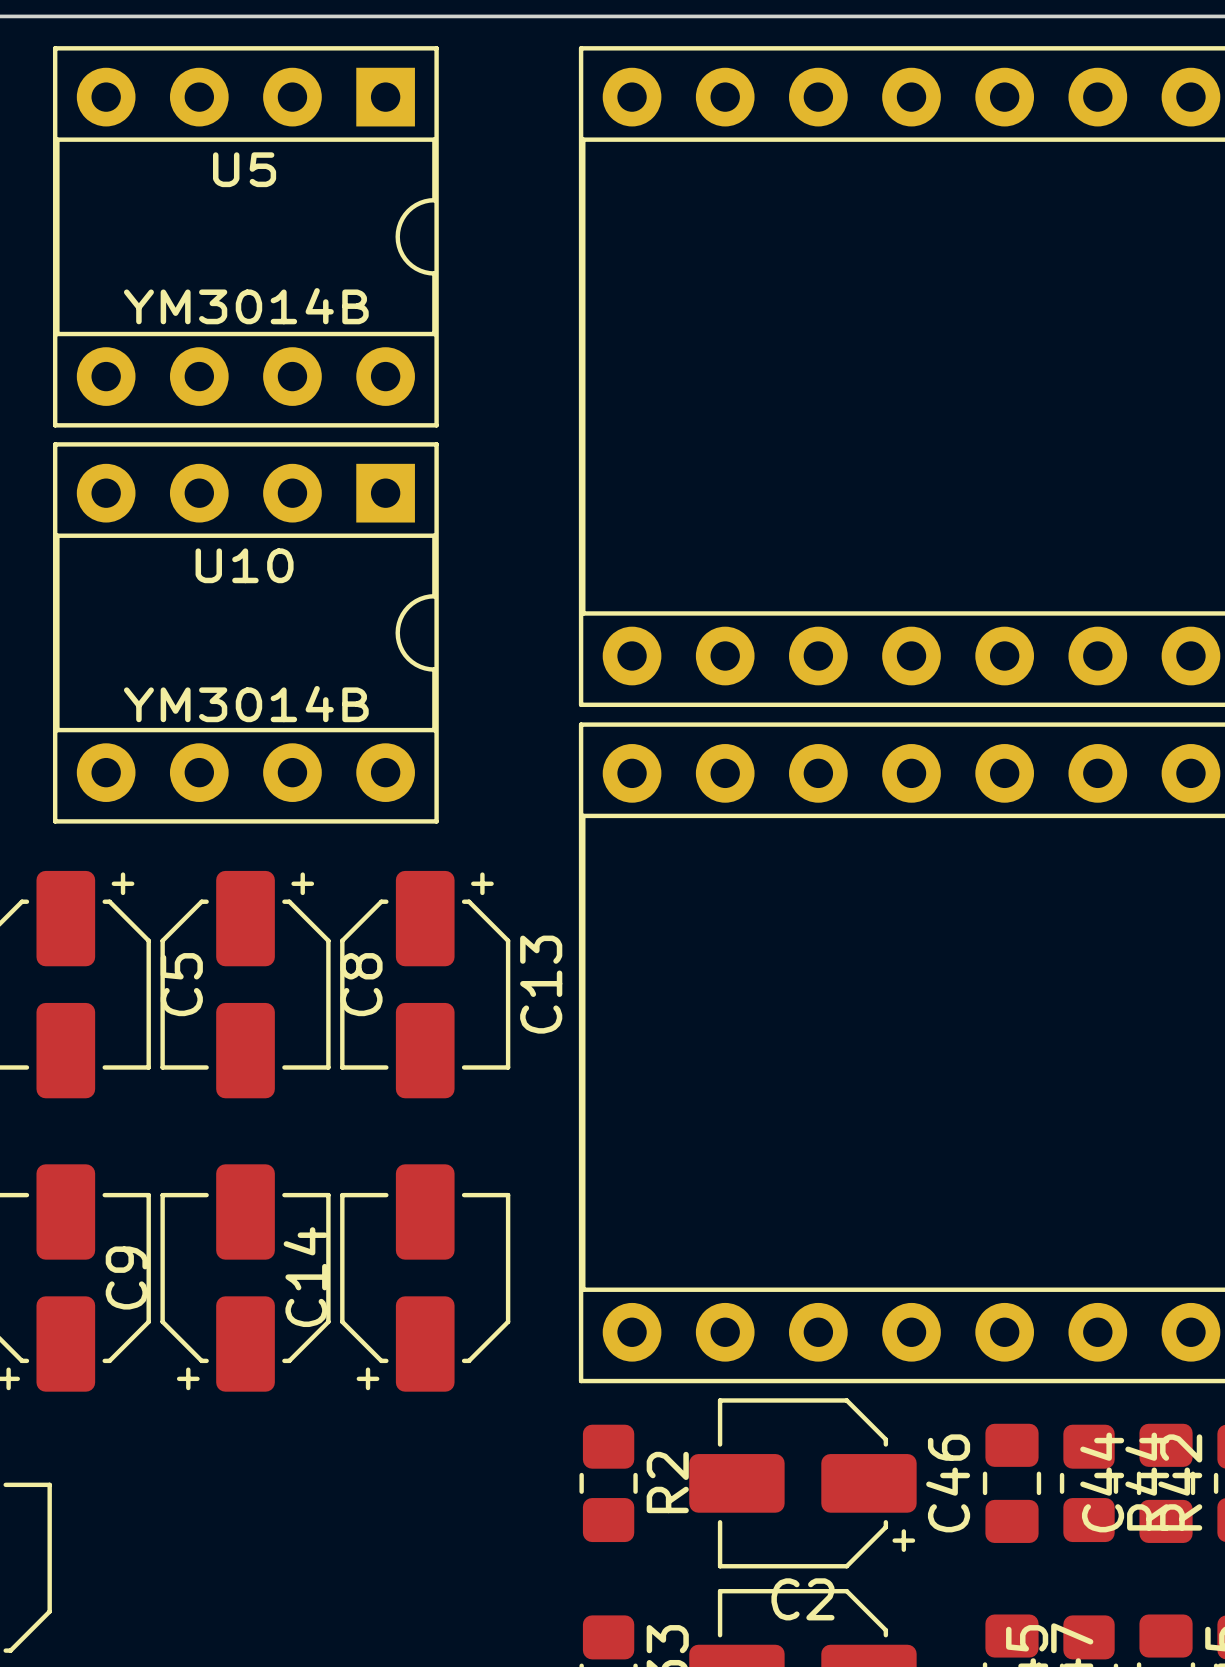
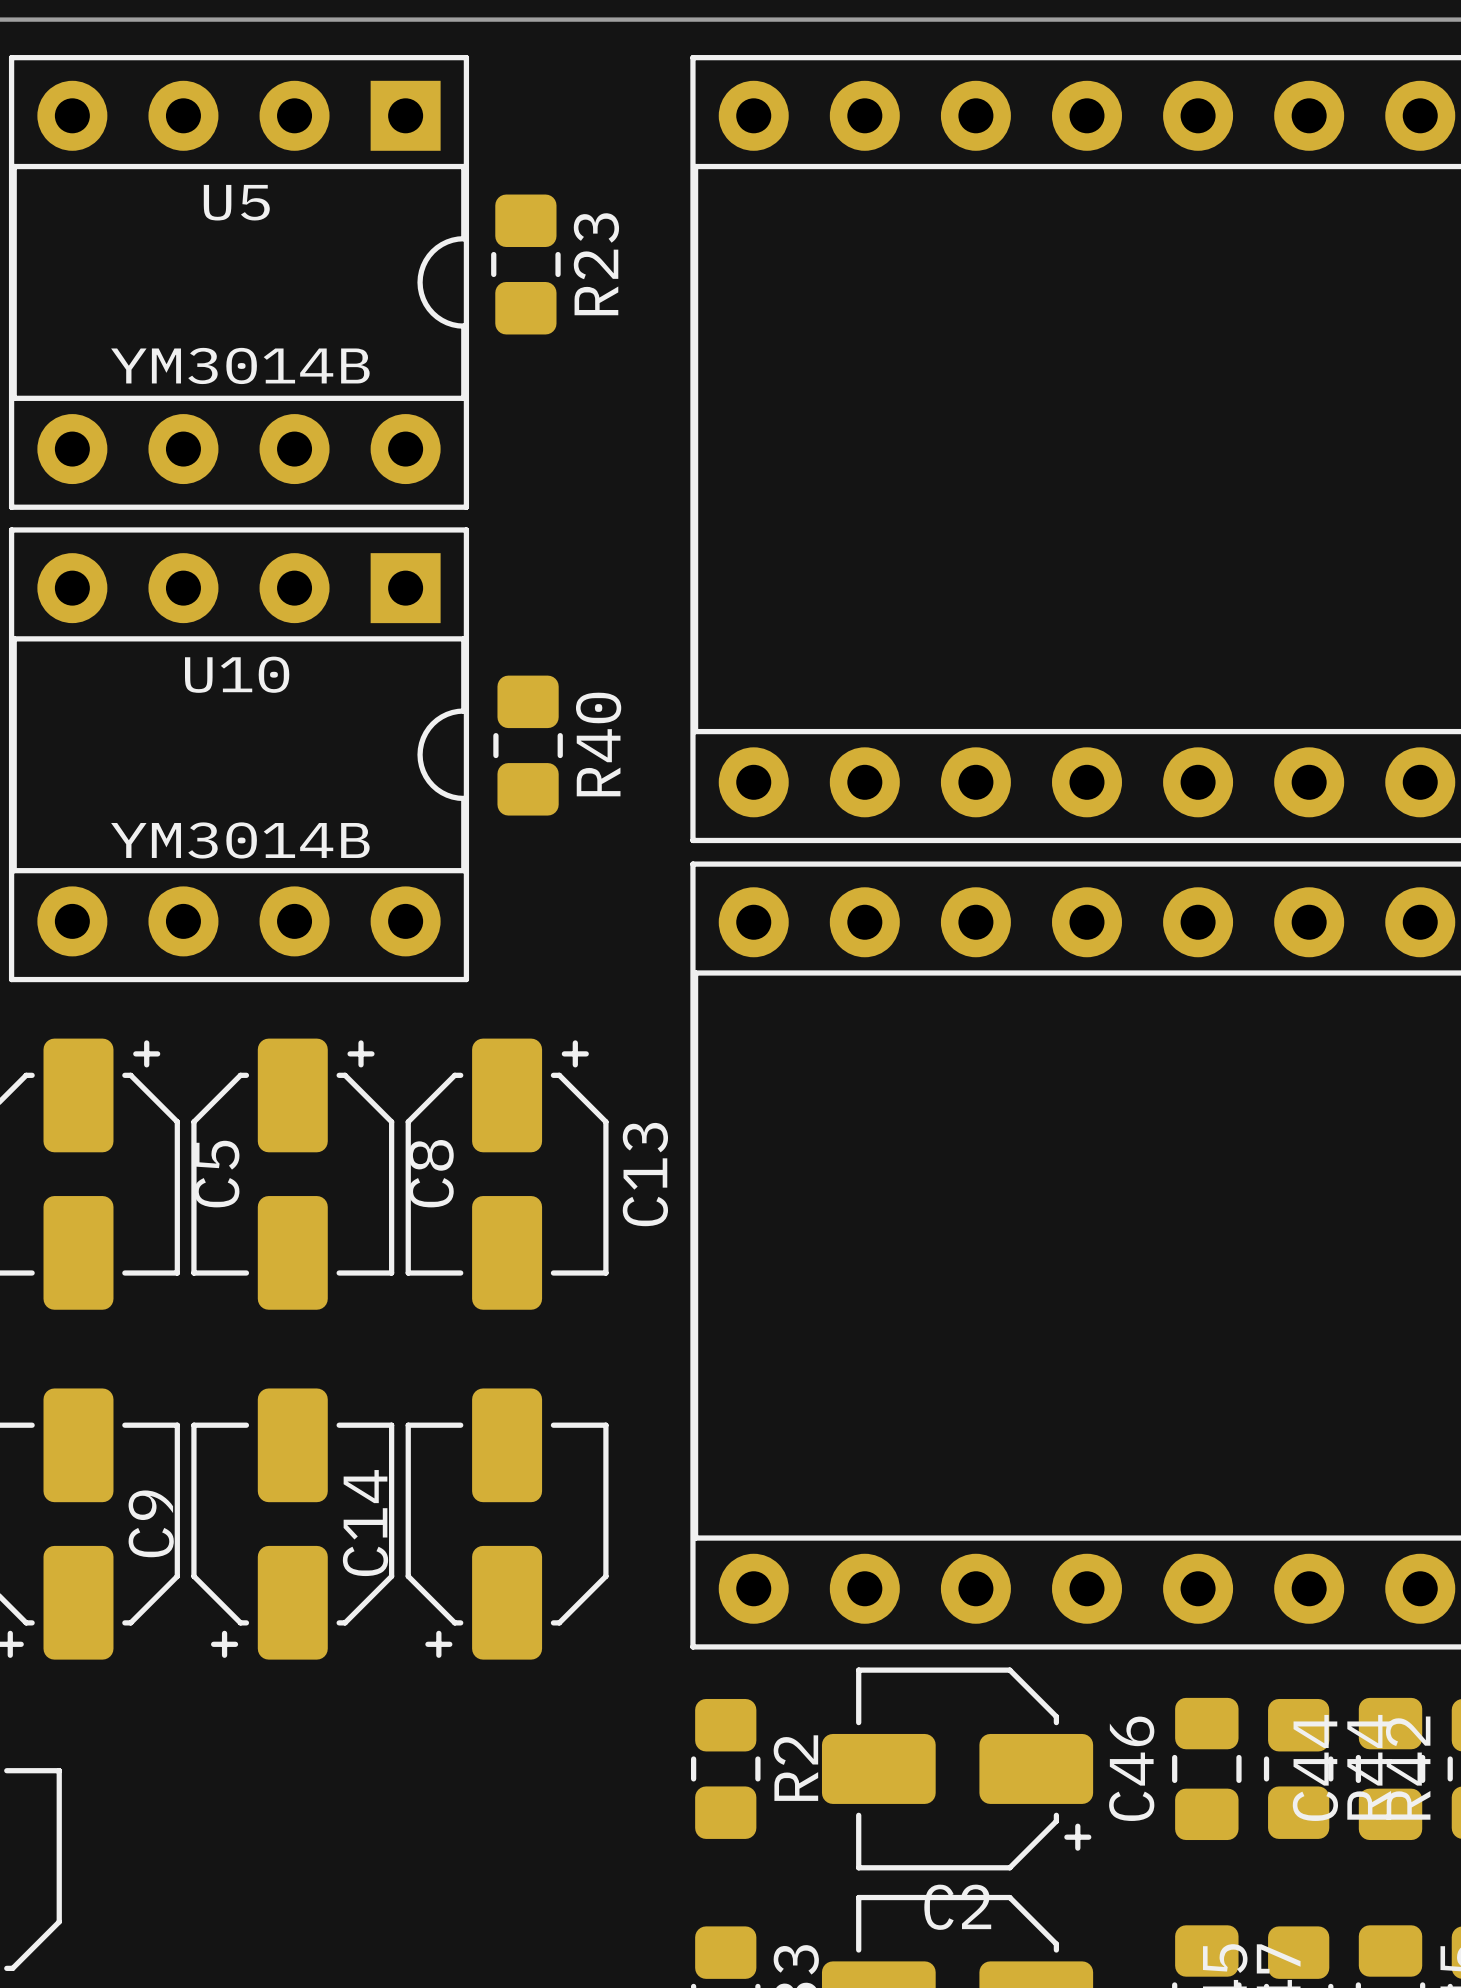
R23: none -> (525, 264)
U5 position: (245, 236) -> (238, 282)
R40: none -> (528, 745)
U10 position: (245, 632) -> (238, 754)

